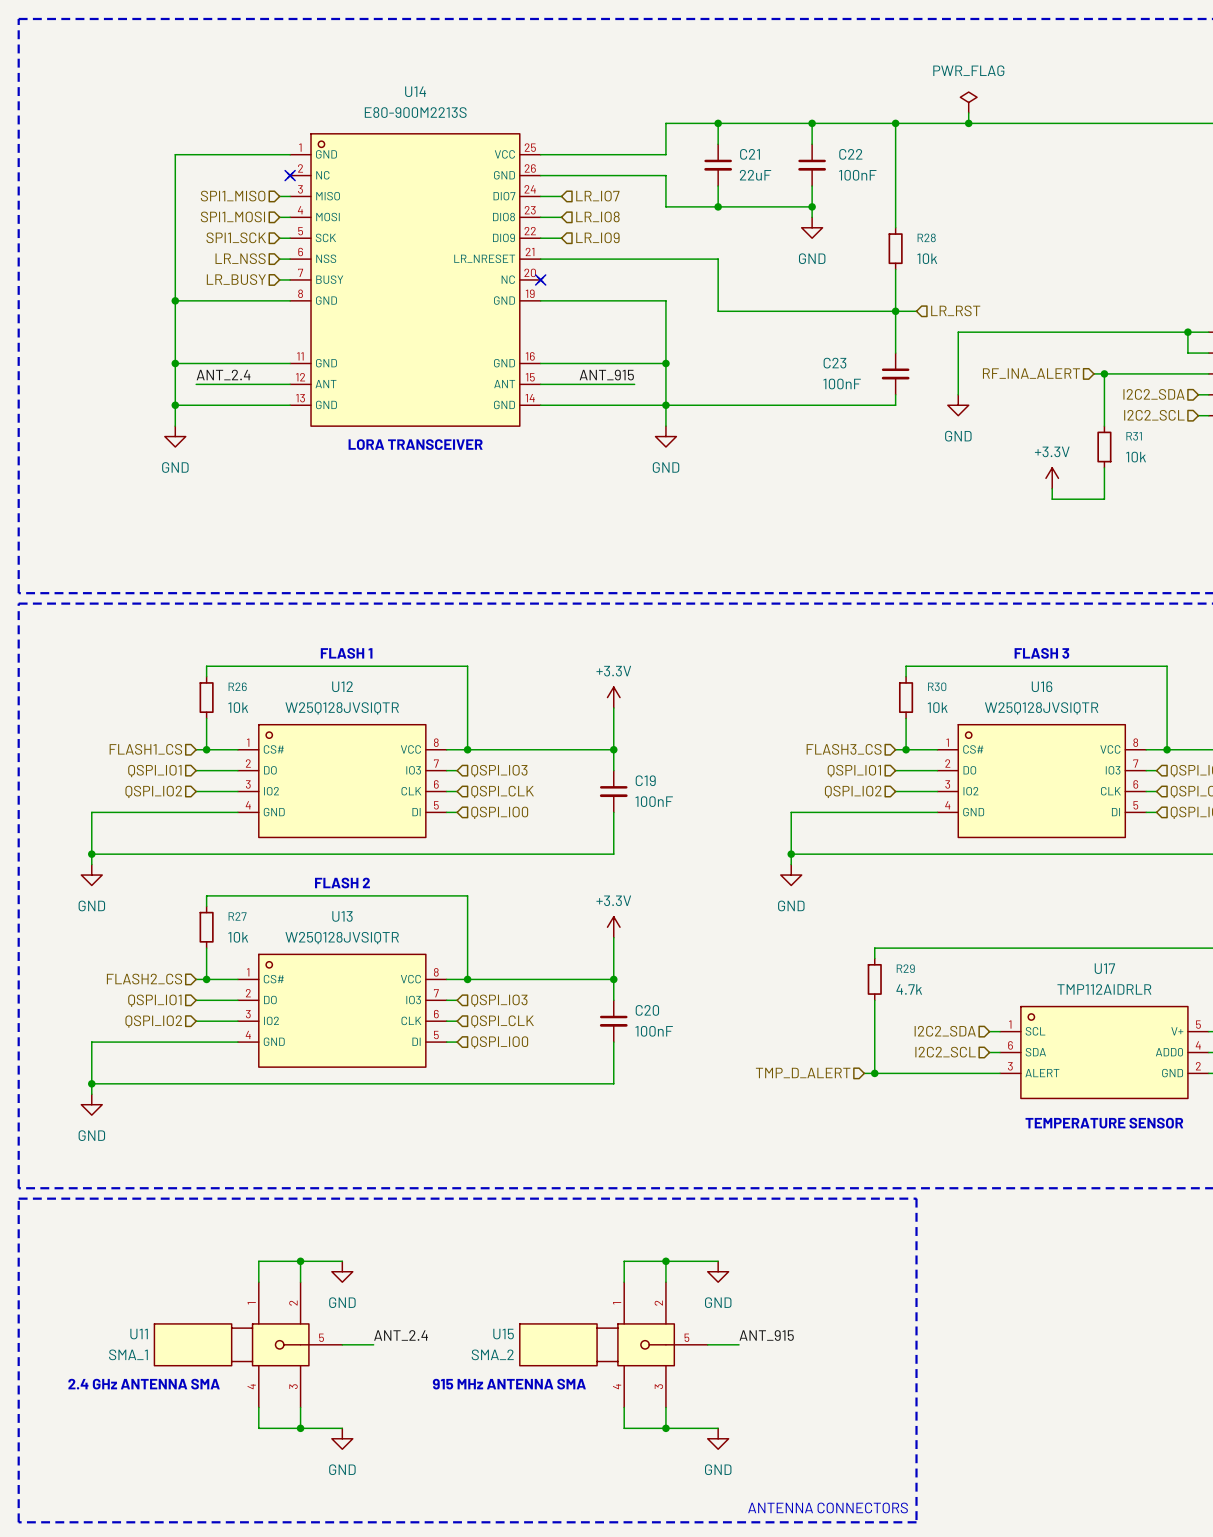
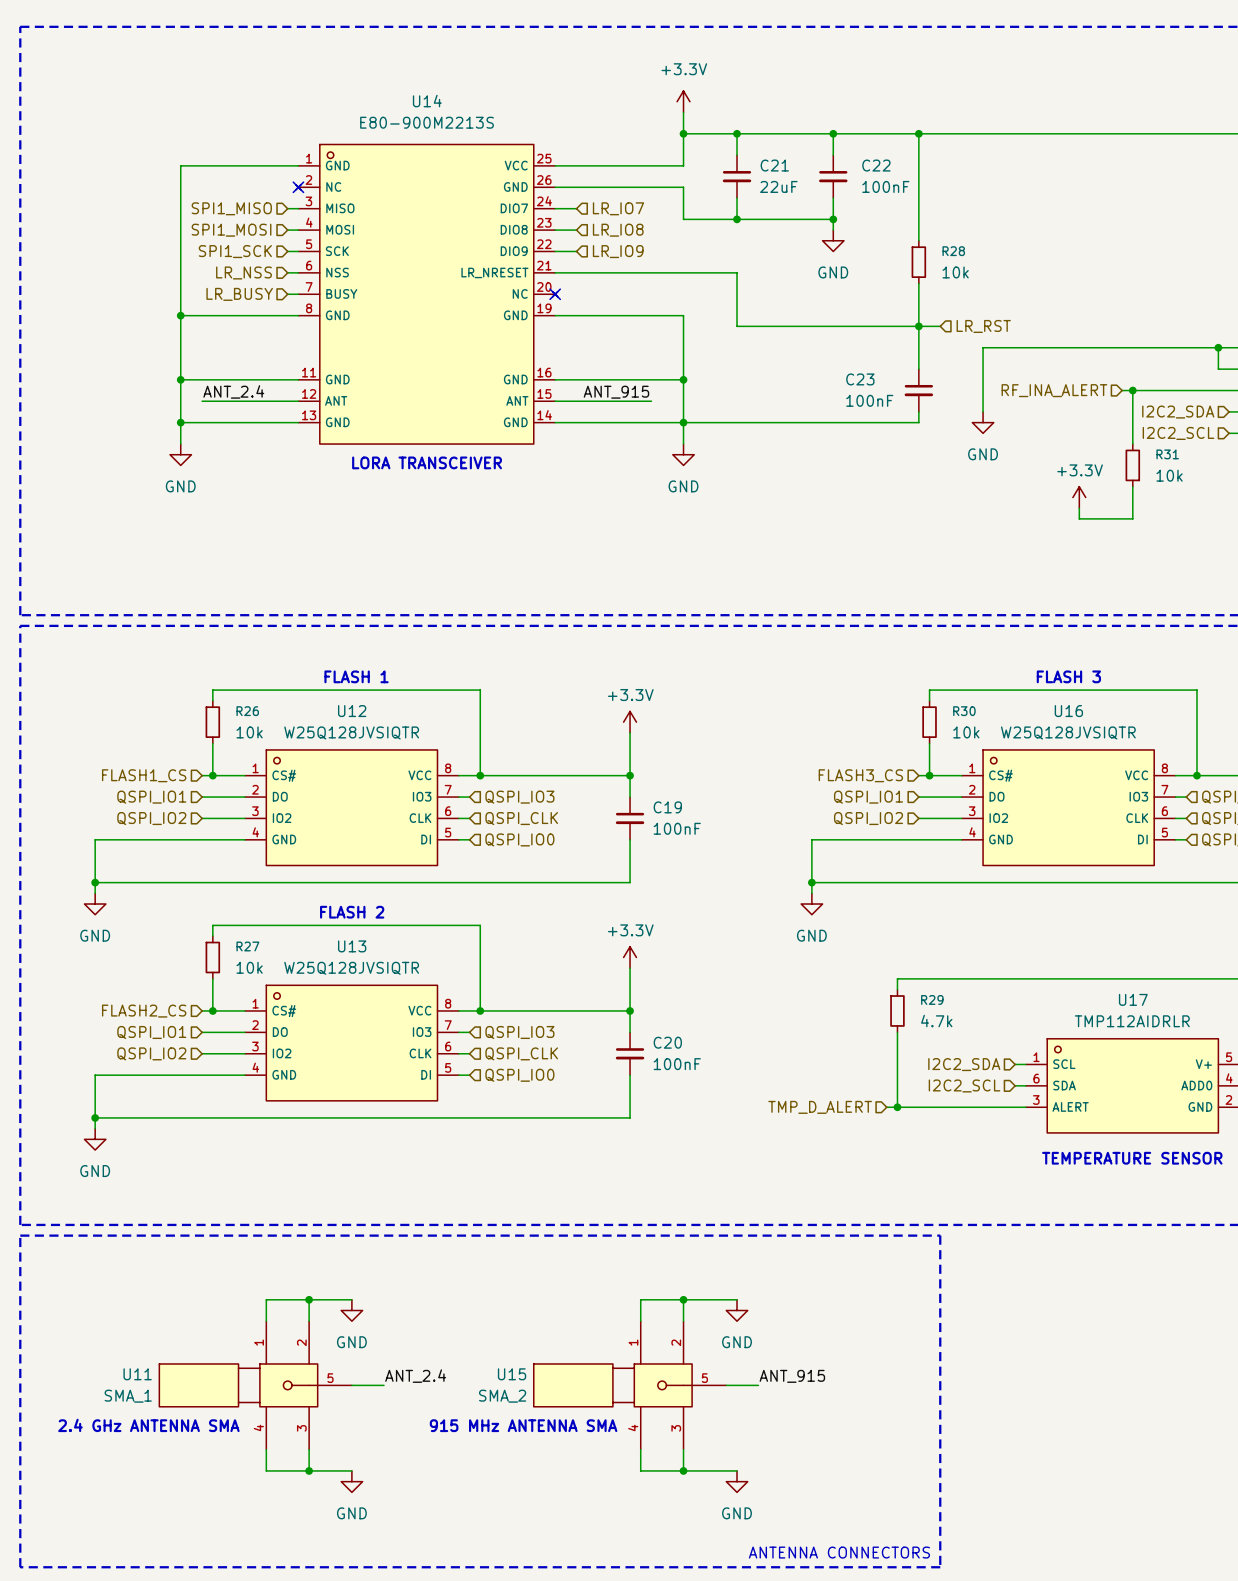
power symbol: none -> +3.3V (683, 101)
wire: none -> (683, 112) (683, 133)
power symbol: PWR_FLAG (968, 102) -> none
wire: (968, 112) (968, 123) -> none
junction: none -> (683, 133)
junction: (968, 123) -> none

